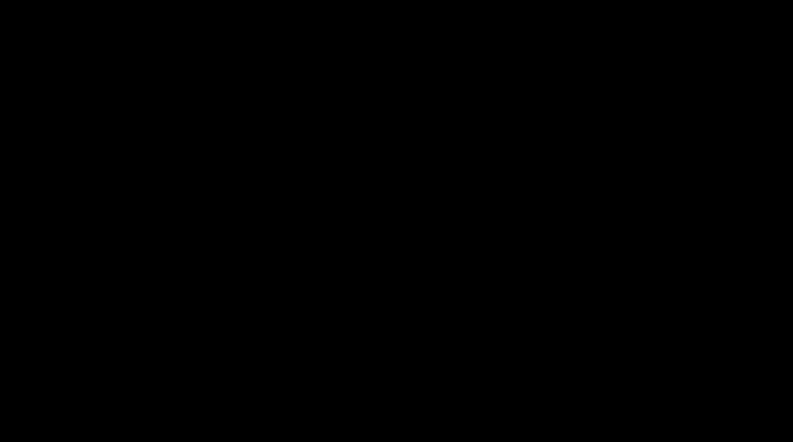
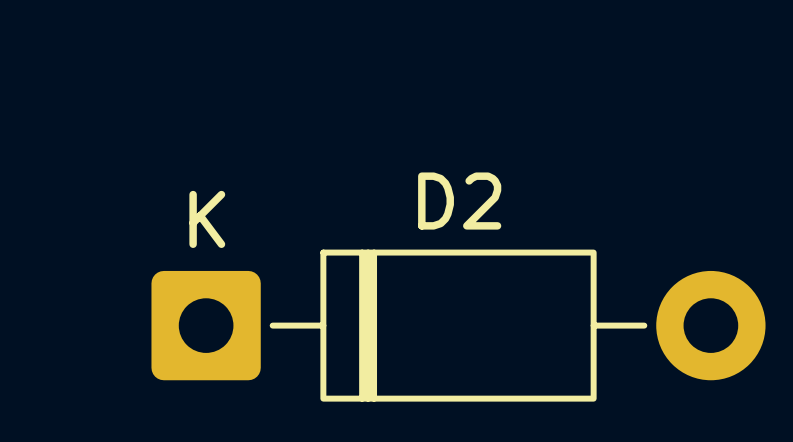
D2: none -> (458, 325)

